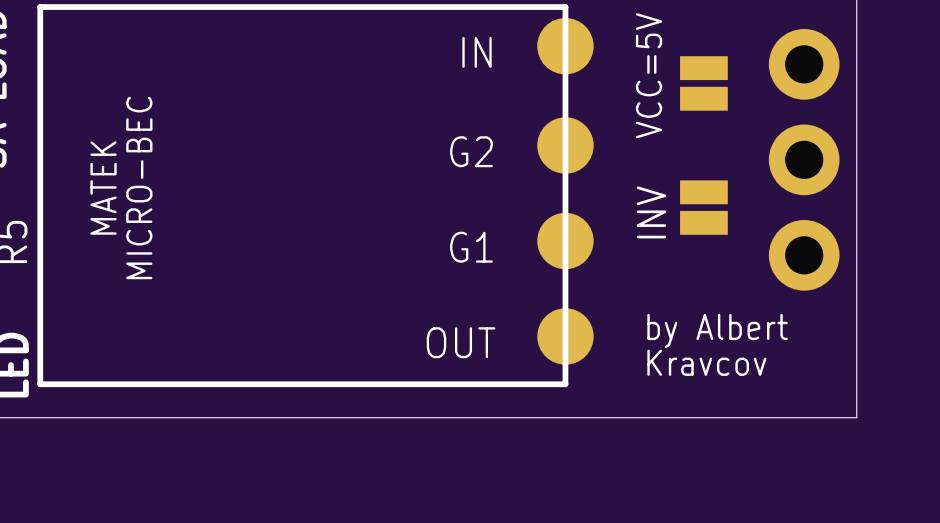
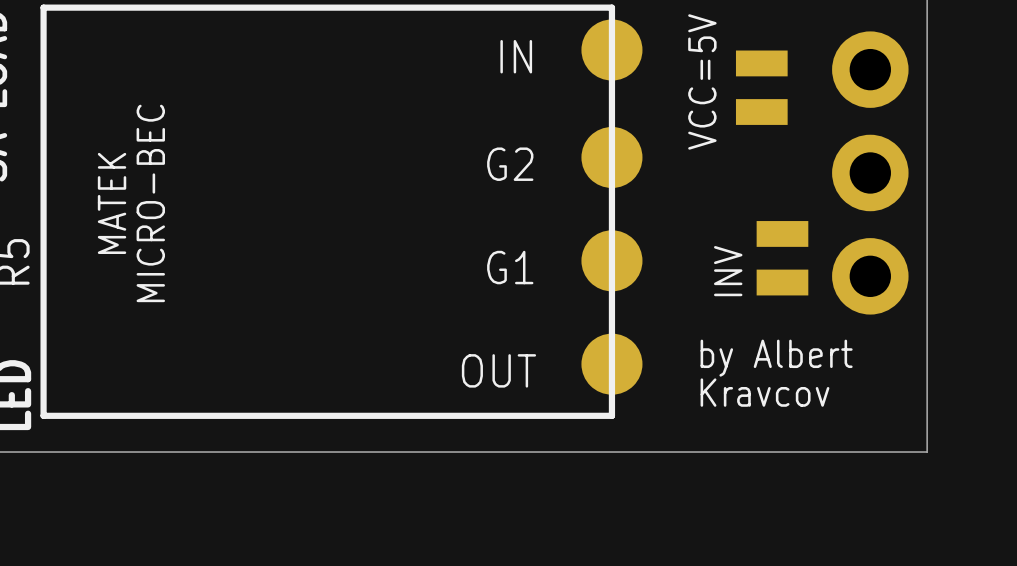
part footprint: [680, 56, 728, 111] -> [735, 50, 788, 125]
INV: (703, 207) -> none
part: none -> (782, 258)
text: none -> INV (728, 271)

